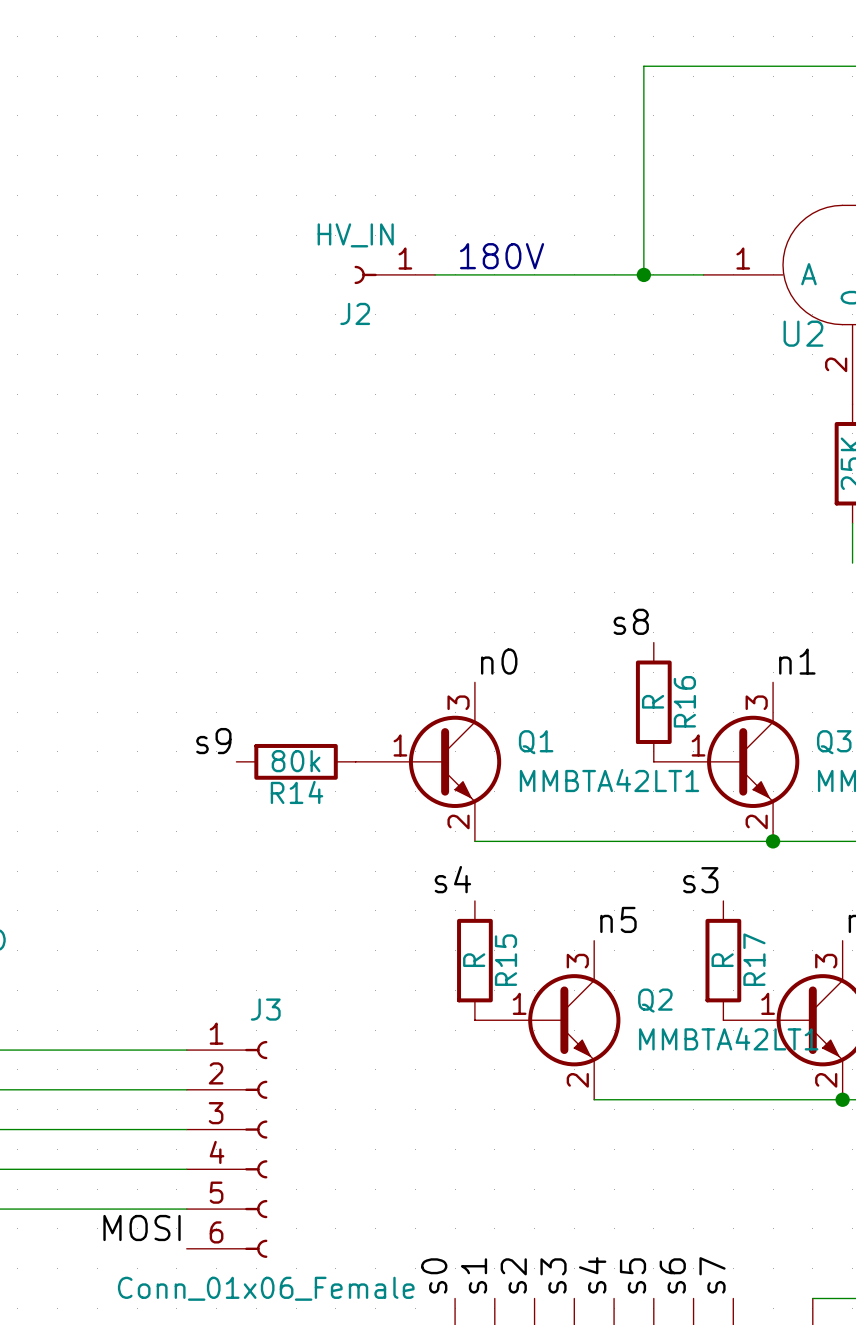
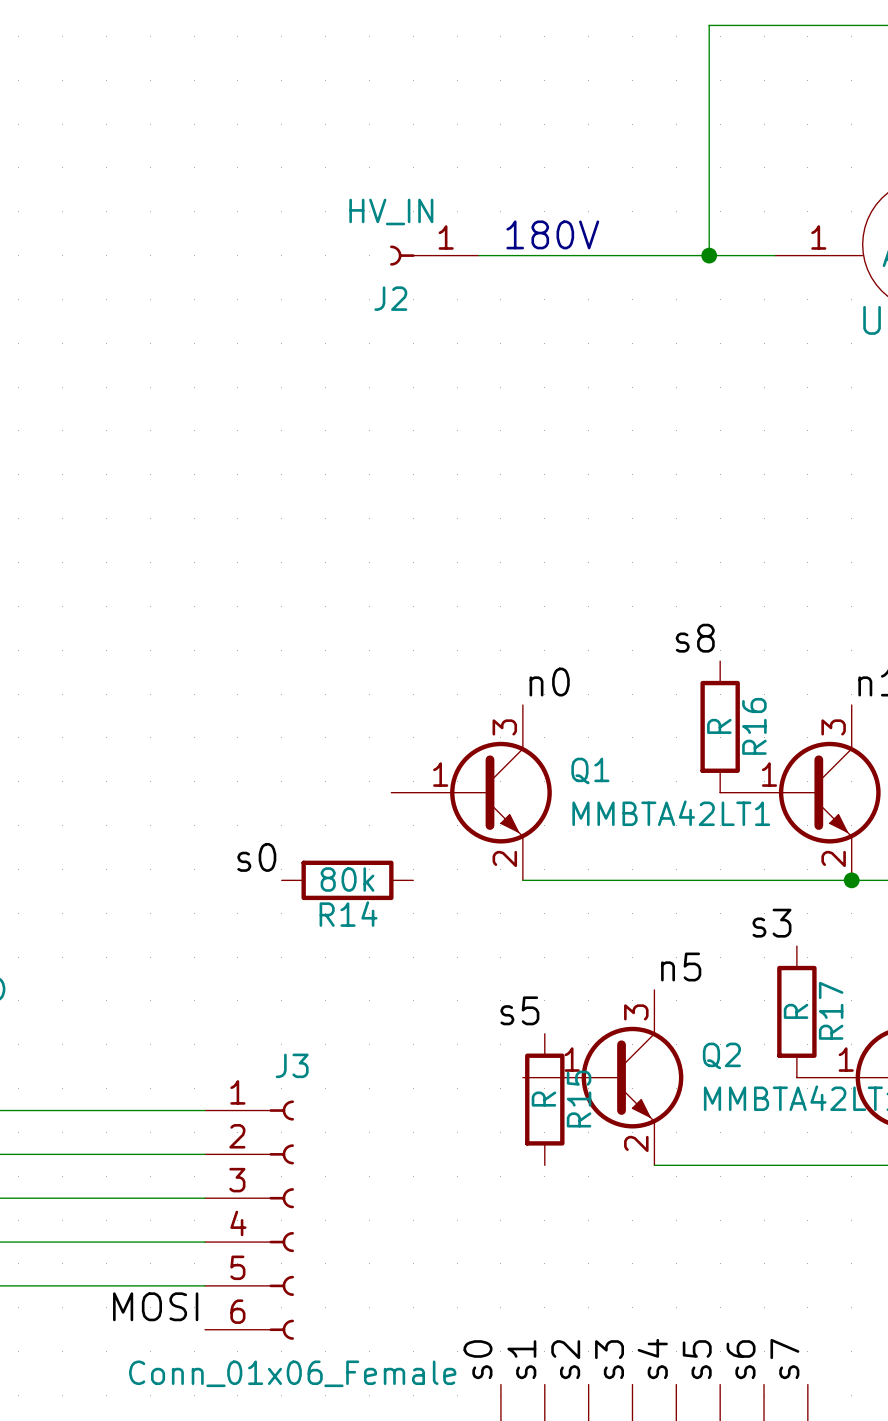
label: s9 (213, 741) -> none
R14 position: (296, 761) -> (347, 880)
label: none -> s0 (256, 857)
label: s4 (452, 879) -> none
label: none -> s5 (519, 1010)
R15 position: (474, 960) -> (544, 1099)

